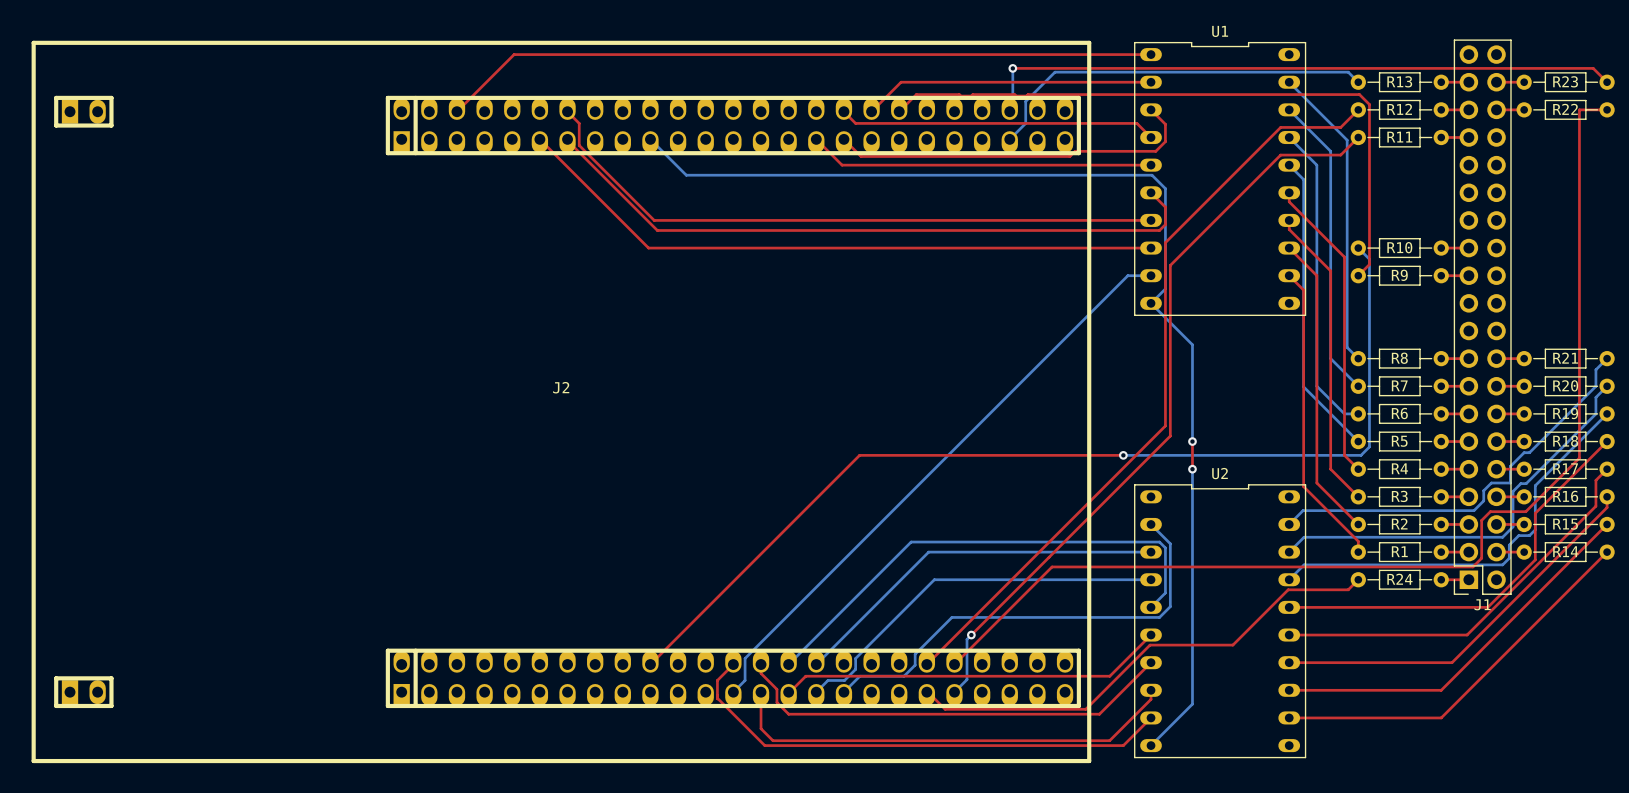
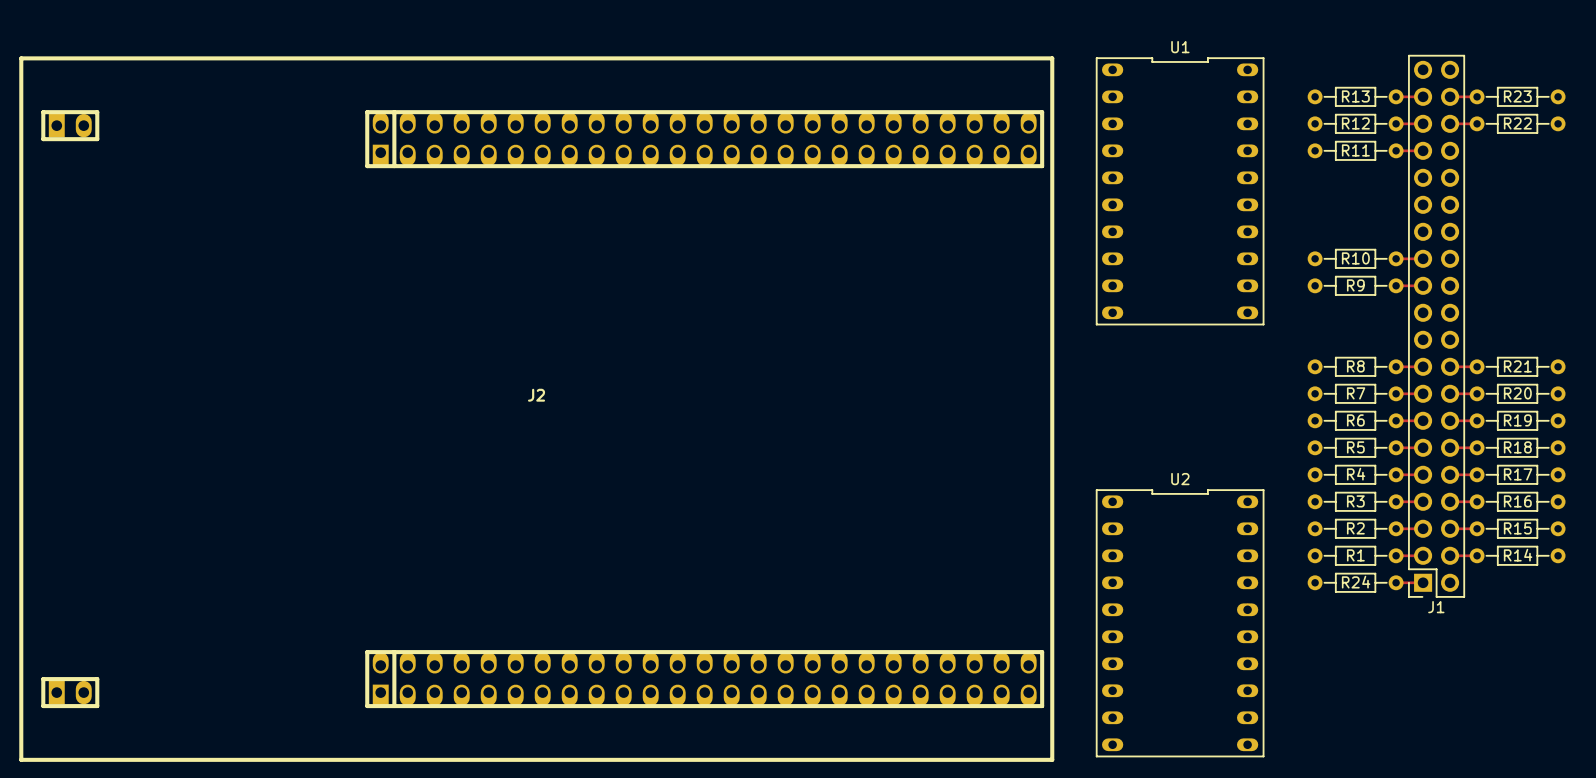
top track: (1151, 54) (514, 54) (456, 111) -> none
top track: (1012, 68) (1593, 68) (1607, 82) -> none
bottom track: (1012, 68) (1012, 108) (1009, 111) -> none
via: (1012, 68) -> none
top track: (1151, 82) (901, 82) (871, 111) -> none
bottom track: (1289, 82) (1347, 140) (1347, 347) (1358, 358) -> none
bottom track: (1358, 82) (1348, 72) (1055, 72) (1025, 101) (1025, 123) (1009, 139) -> none
top track: (1151, 109) (1165, 124) (1165, 141) (1155, 151) (1075, 151) (1069, 156) (861, 156) (843, 139) -> none
bottom track: (1289, 109) (1330, 151) (1330, 358) (1358, 386) -> none
top track: (1358, 109) (1340, 127) (1280, 127) (1165, 242) (1165, 425) (926, 664) -> none
top track: (1607, 109) (1579, 109) (1579, 458) (1525, 511) (1490, 511) (1481, 520) (1481, 558) (1472, 566) (1052, 566) (954, 664) -> none
top track: (567, 111) (579, 123) (579, 145) (654, 220) (1151, 220) -> none
top track: (843, 111) (855, 123) (1136, 123) (1151, 137) -> none
top track: (899, 111) (916, 94) (1359, 94) (1369, 104) (1369, 264) (1358, 275) -> none
bottom track: (1289, 137) (1316, 165) (1316, 386) (1344, 413) (1358, 413) -> none
top track: (1358, 137) (1340, 155) (1280, 155) (1170, 265) (1170, 436) (971, 635) -> none
top track: (539, 139) (648, 248) (1151, 248) -> none
top track: (567, 139) (657, 230) (1159, 230) (1165, 224) (1165, 207) (1151, 192) -> none
bottom track: (650, 139) (686, 175) (1152, 175) (1165, 188) (1165, 288) (1151, 303) (1192, 344) (1192, 441) -> none
top track: (816, 139) (842, 165) (1151, 165) -> none
bottom track: (1289, 165) (1303, 179) (1303, 386) (1358, 441) -> none
top track: (1289, 192) (1289, 201) (1344, 257) (1344, 455) (1358, 469) -> none
top track: (1289, 220) (1289, 229) (1330, 270) (1330, 469) (1358, 496) -> none
top track: (1289, 248) (1316, 275) (1316, 483) (1358, 524) -> none
bottom track: (1358, 248) (1369, 259) (1369, 446) (1361, 455) (1123, 455) -> none
bottom track: (1151, 275) (1127, 275) (745, 658) (745, 680) (733, 692) -> none
top track: (1289, 275) (1303, 290) (1303, 486) (1358, 541) (1358, 552) -> none
bottom track: (1607, 358) (1595, 369) (1595, 386) (1529, 452) (1524, 452) (1510, 466) (1510, 483) (1491, 483) (1483, 490) (1483, 500) (1473, 510) (1303, 510) (1289, 524) -> none
bottom track: (1607, 386) (1595, 397) (1595, 413) (1526, 483) (1520, 483) (1513, 491) (1513, 526) (1502, 537) (1304, 537) (1289, 552) -> none
bottom track: (1607, 413) (1535, 485) (1535, 529) (1529, 535) (1518, 535) (1509, 545) (1509, 558) (1502, 564) (1304, 564) (1289, 579) -> none
top track: (1192, 441) (1192, 469) -> none
via: (1192, 441) -> none
top track: (1607, 441) (1535, 513) (1535, 559) (1487, 607) (1289, 607) -> none
top track: (1123, 455) (859, 455) (650, 664) -> none
via: (1123, 455) -> none
bottom track: (1192, 469) (1192, 704) (1151, 745) -> none
via: (1192, 469) -> none
top track: (1607, 469) (1595, 480) (1595, 506) (1467, 635) (1289, 635) -> none
top track: (1607, 496) (1607, 507) (1452, 662) (1289, 662) -> none
bottom track: (1151, 524) (1170, 543) (1170, 606) (1159, 617) (951, 617) (915, 654) (915, 665) (904, 676) (859, 676) (843, 692) -> none
top track: (1607, 524) (1441, 690) (1289, 690) -> none
bottom track: (1151, 552) (928, 552) (816, 664) -> none
top track: (1607, 552) (1441, 717) (1289, 717) -> none
bottom track: (1151, 579) (934, 579) (855, 658) (855, 669) (844, 680) (827, 680) (816, 692) -> none
top track: (1358, 579) (1348, 589) (1288, 589) (1232, 645) (1150, 645) (1085, 709) (945, 709) (926, 692) -> none
bottom track: (1151, 607) (1165, 592) (1165, 547) (1159, 542) (911, 542) (788, 664) -> none
bottom track: (971, 635) (967, 639) (967, 679) (954, 692) -> none
via: (971, 635) -> none
top track: (1151, 635) (1109, 676) (805, 676) (788, 692) -> none
top track: (1151, 662) (1099, 714) (788, 714) (776, 702) (776, 689) (761, 673) (761, 664) -> none
top track: (733, 664) (717, 680) (717, 698) -> none
top track: (1151, 690) (1151, 699) (1109, 740) (772, 740) (761, 728) (761, 692) -> none
top track: (717, 698) (764, 745) (1123, 745) (1151, 717) -> none

